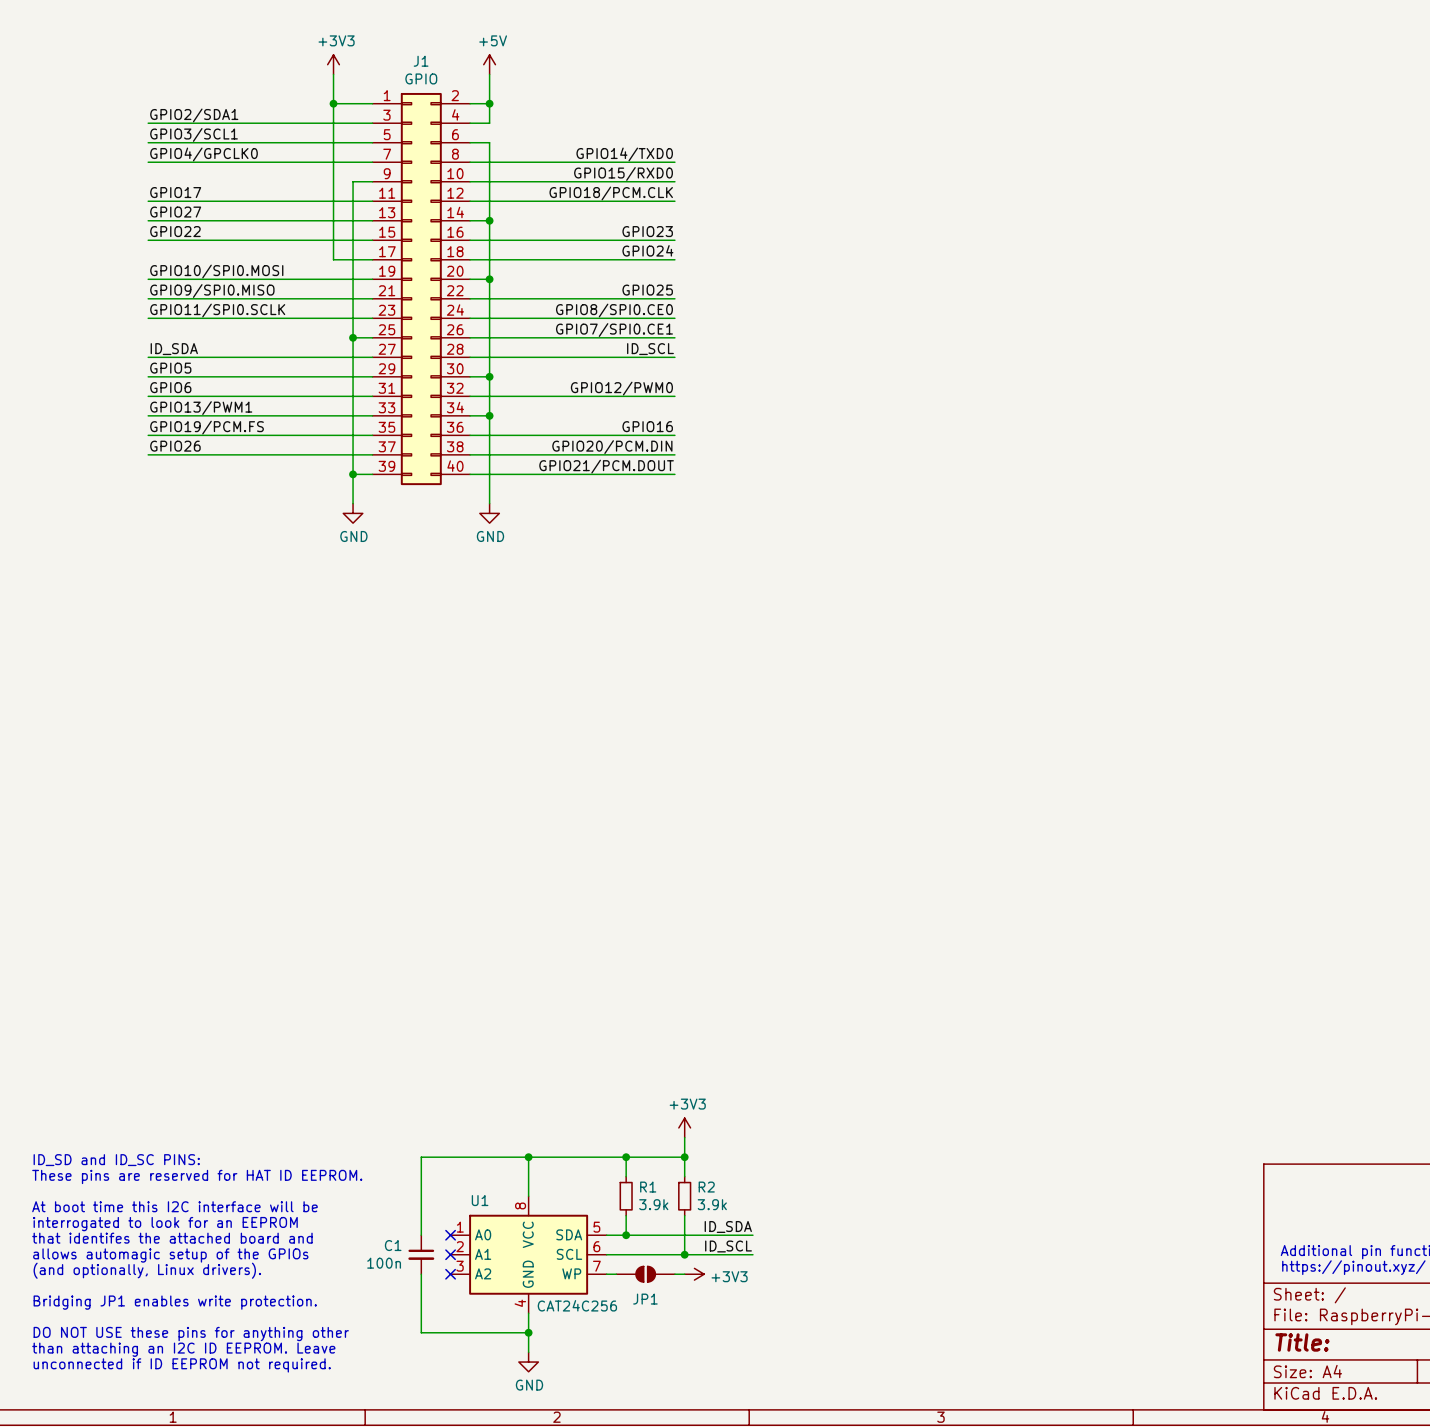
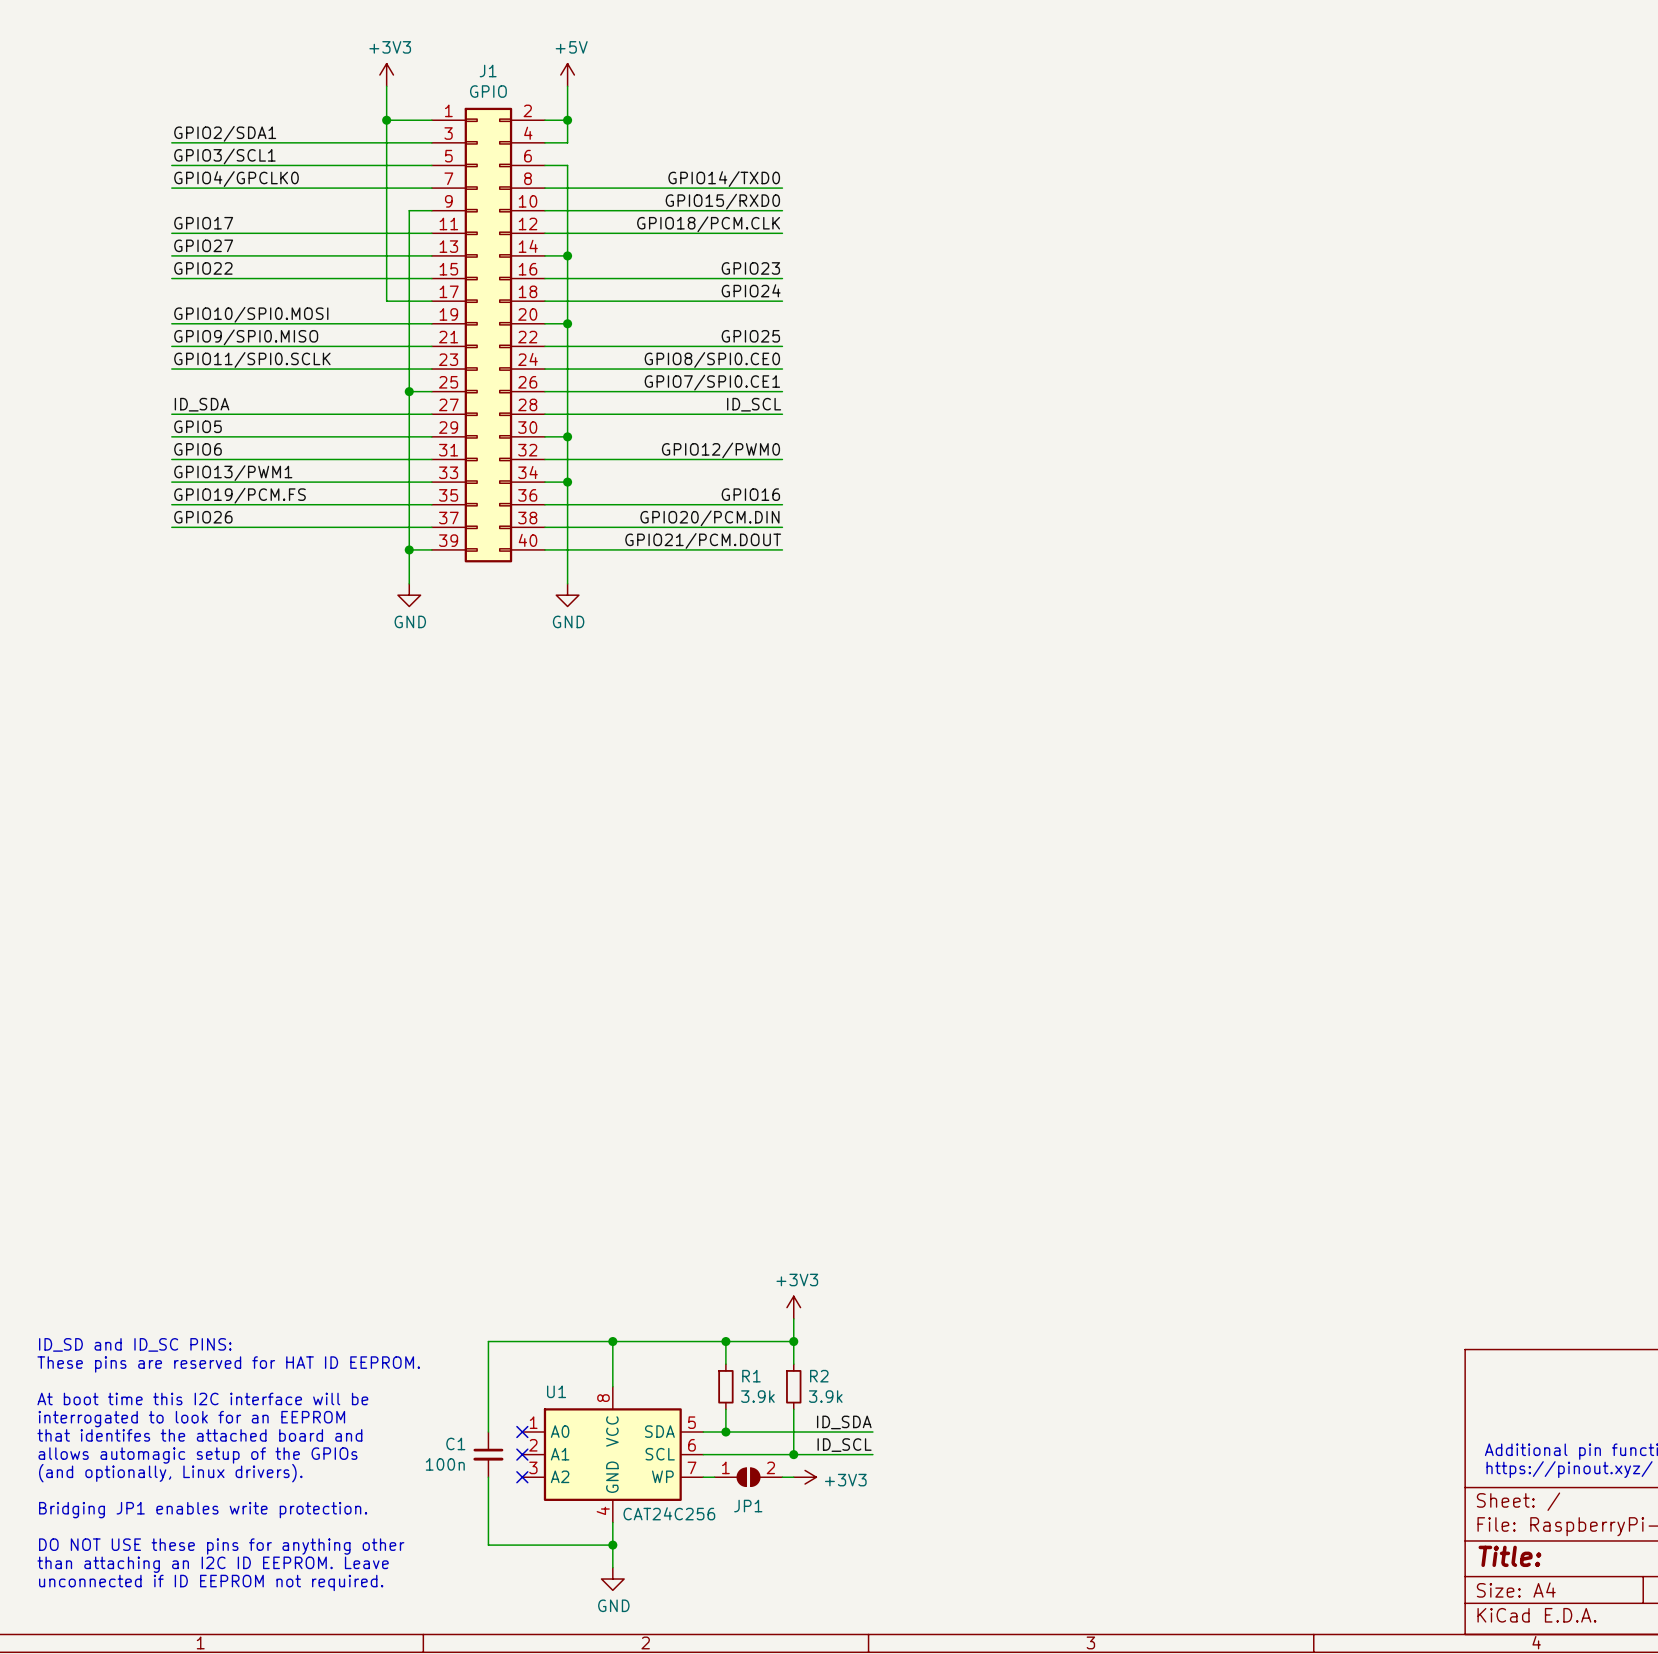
JP1 pin number: none -> 1 (725, 1467)
JP1 pin number: none -> 2 (770, 1467)

